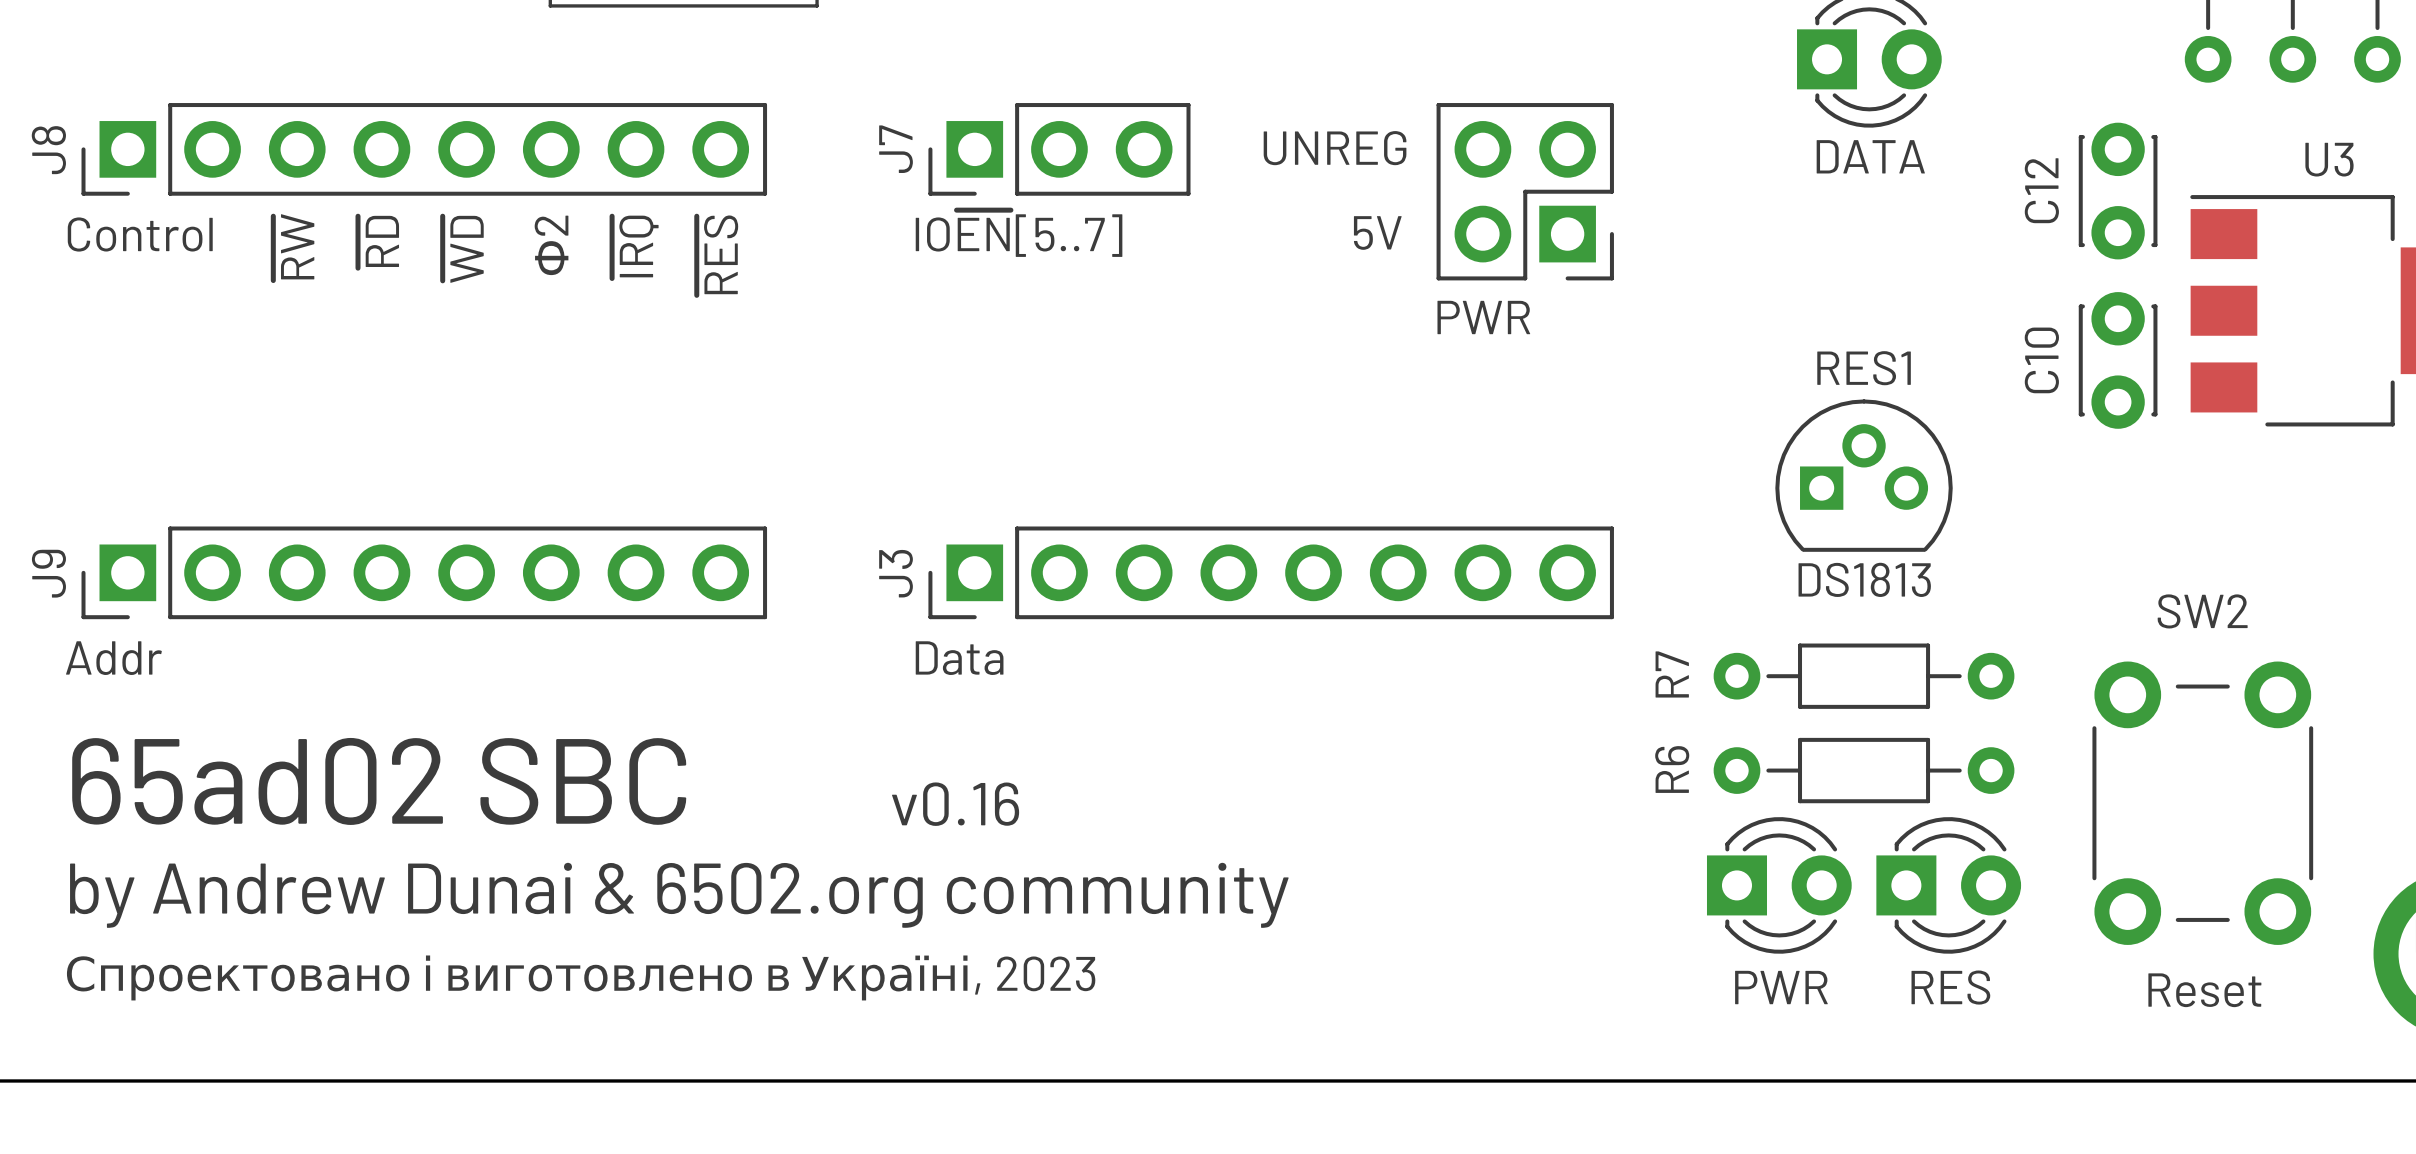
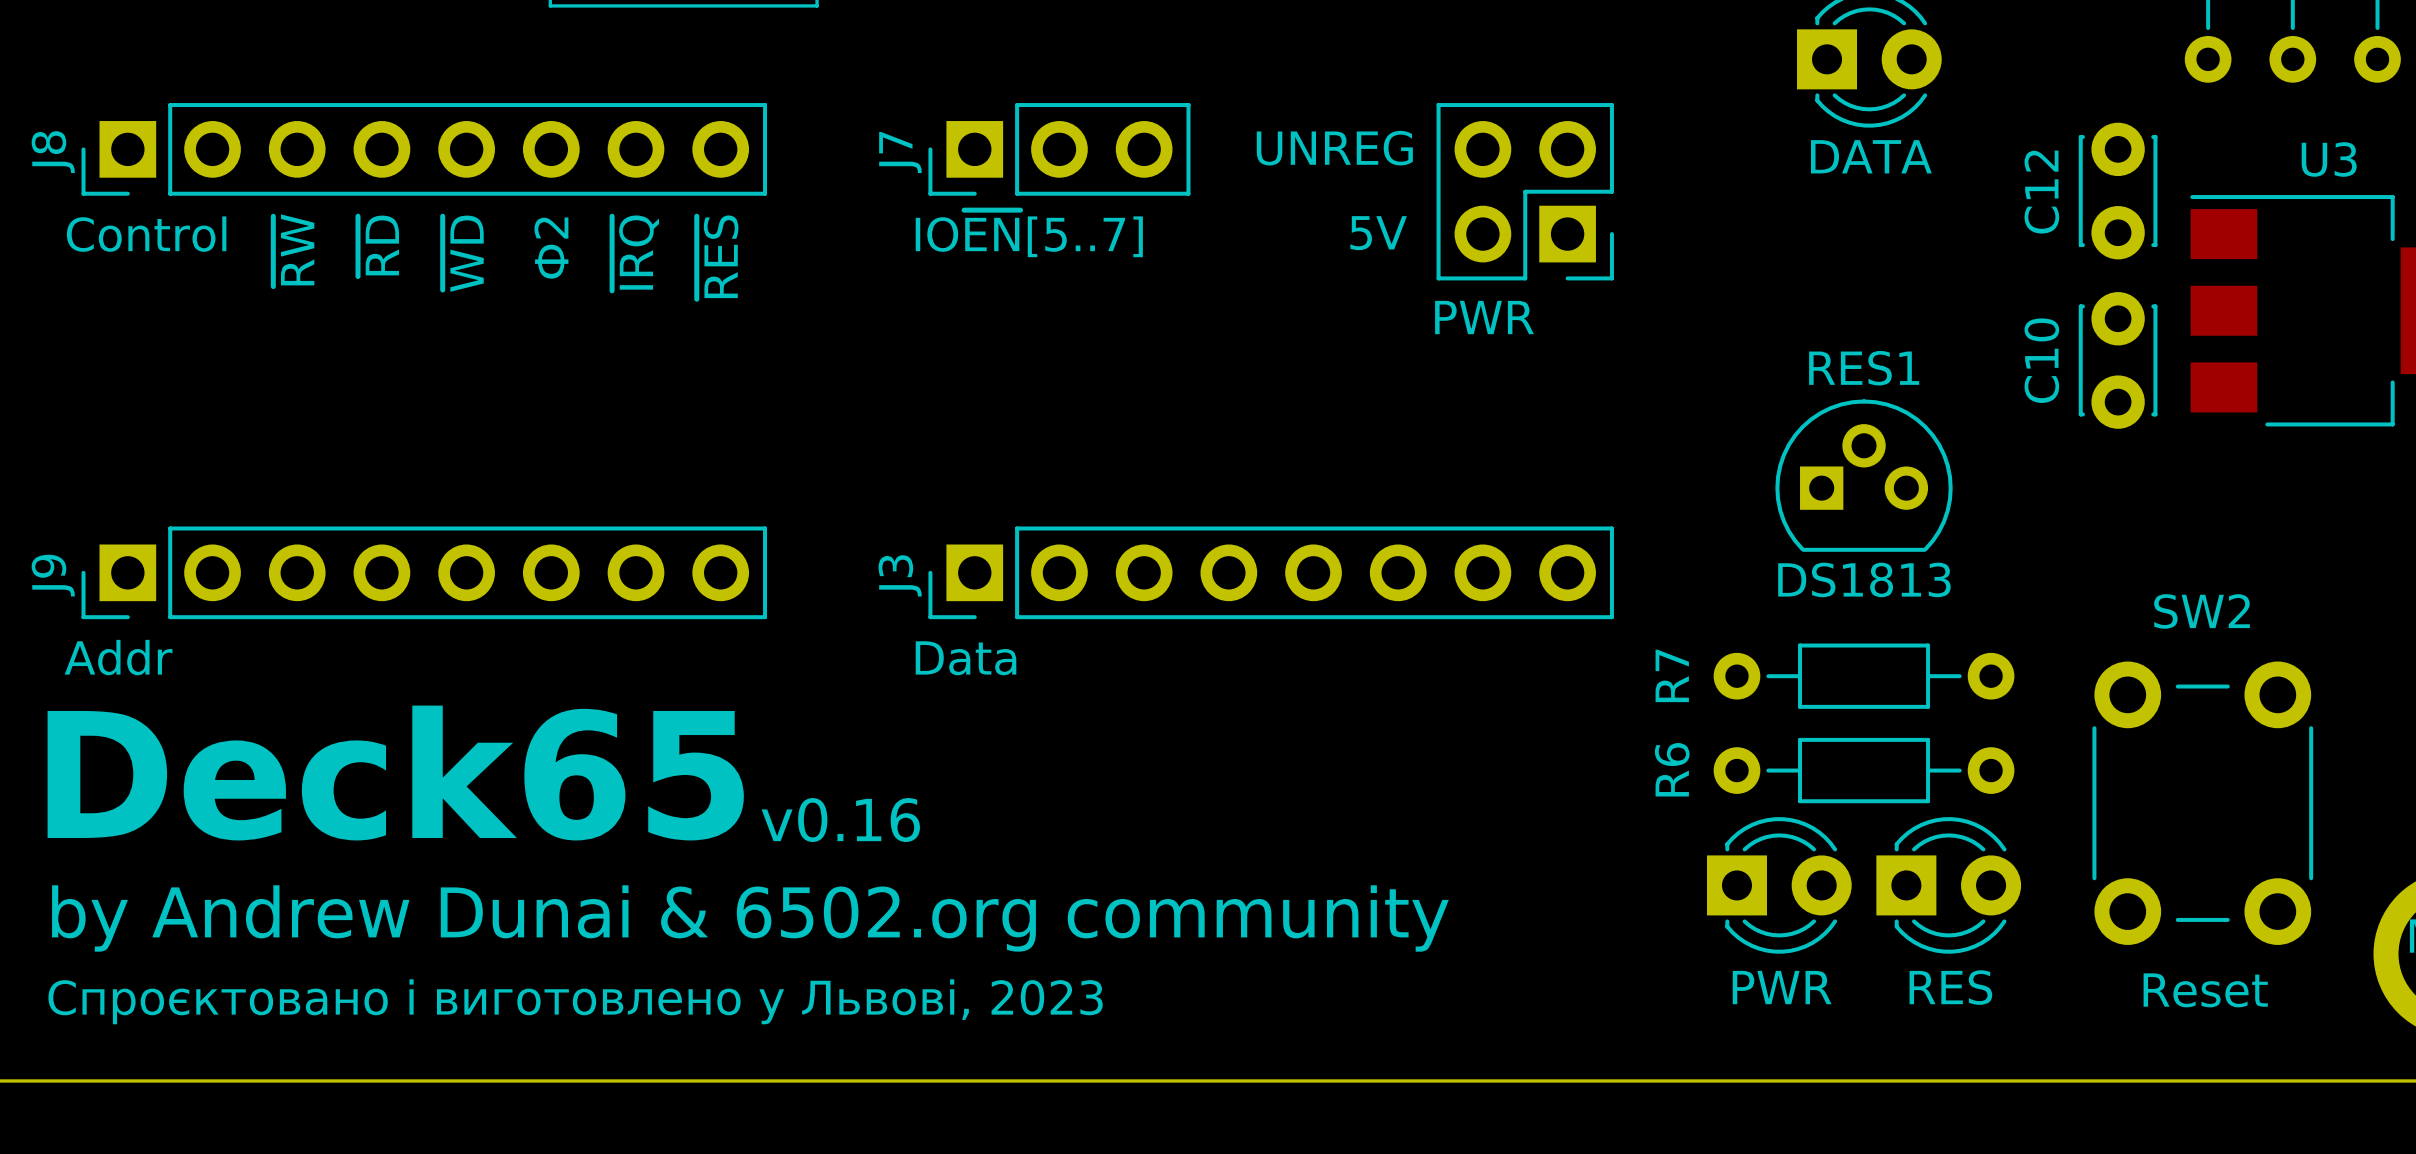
text: 65ad02 SBC (379, 781) -> Deck65 (395, 773)
text position: v0.16 (955, 804) -> v0.16 (840, 820)
text position: by Andrew Dunai & 6502.org community (679, 895) -> by Andrew Dunai & 6502.org community (750, 918)
text: Спроектовано і виготовлено в Україні, 2023 (581, 977) -> Спроєктовано і виготовлено у Львові, 2023 (575, 1001)

